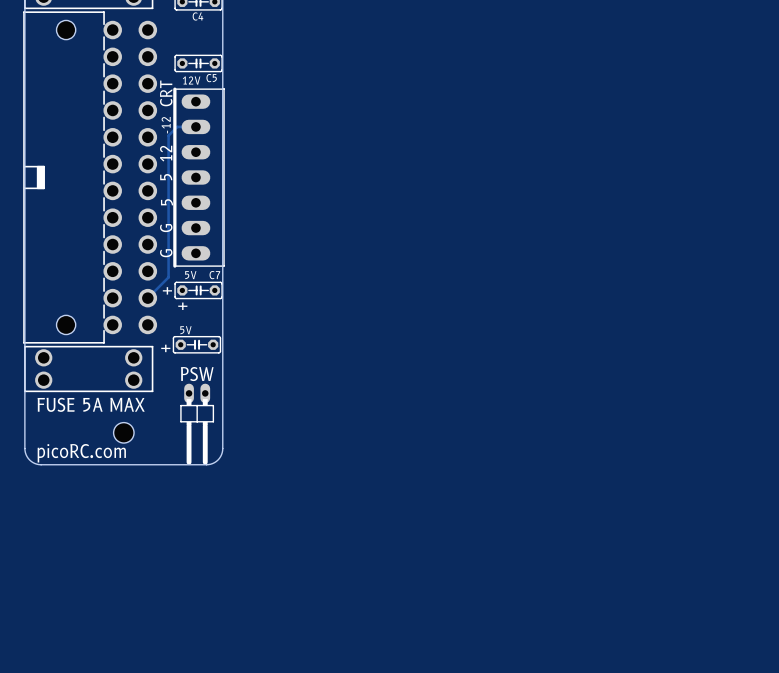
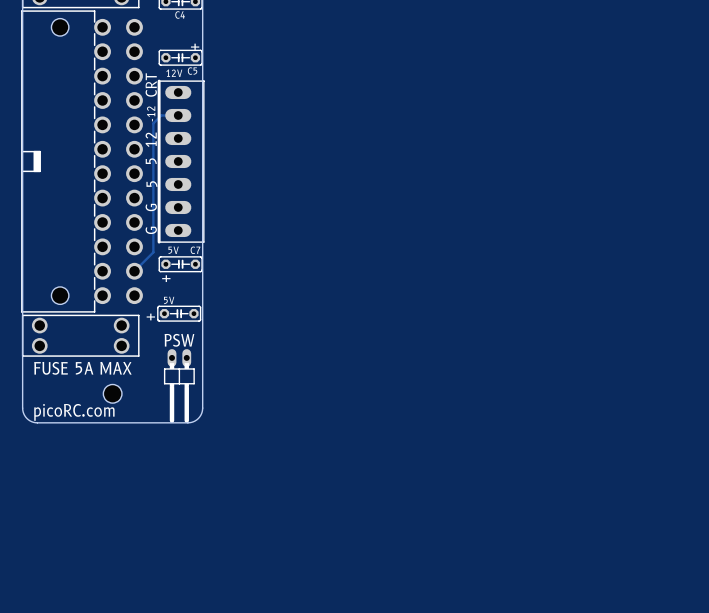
text: none -> + (195, 47)
text: + (167, 290) -> none

